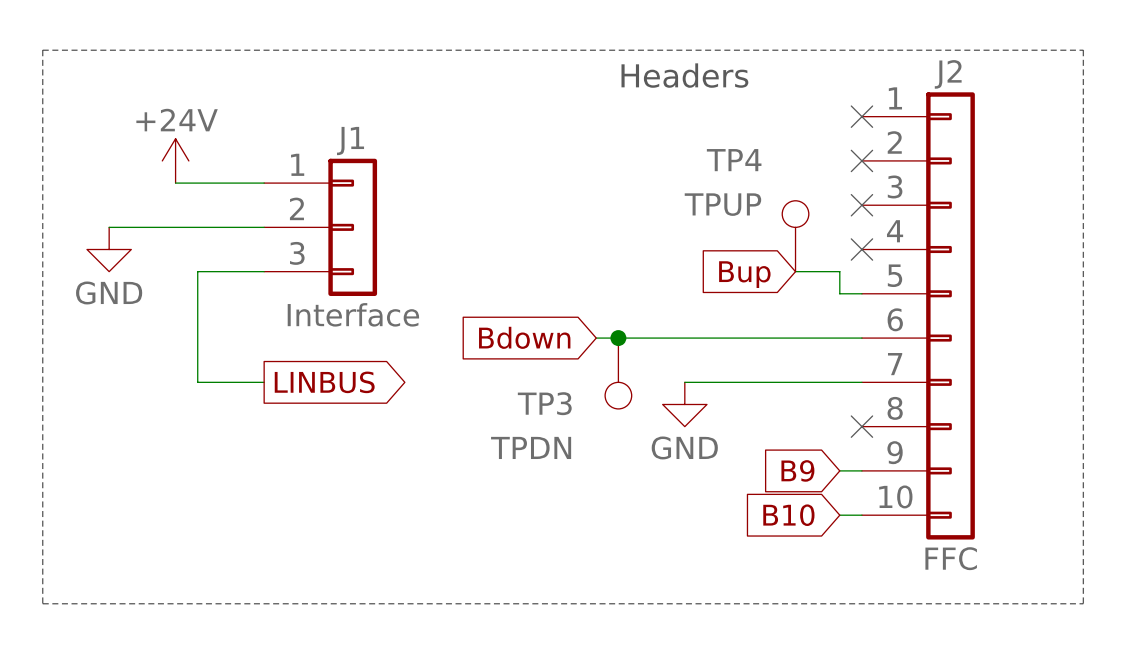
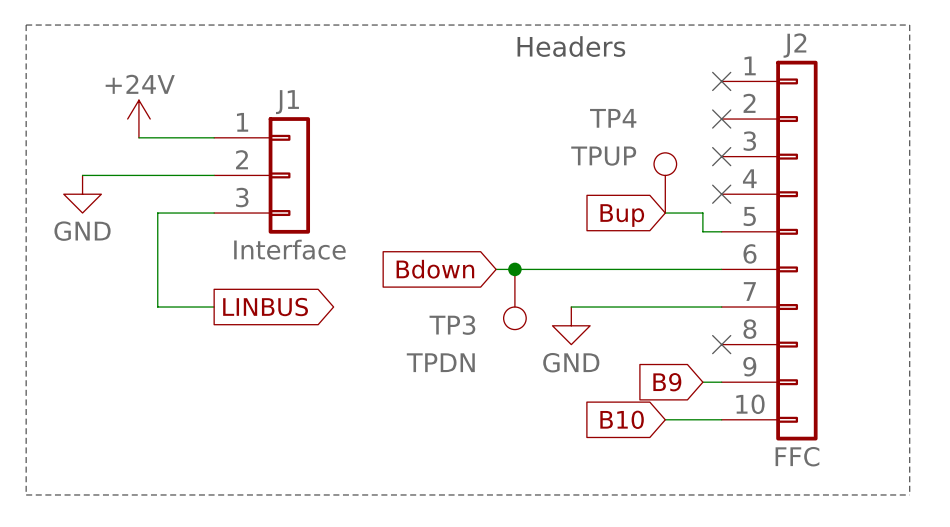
global label position: B10 (788, 515) -> B10 (622, 419)
wire: none -> (665, 419) (702, 419)

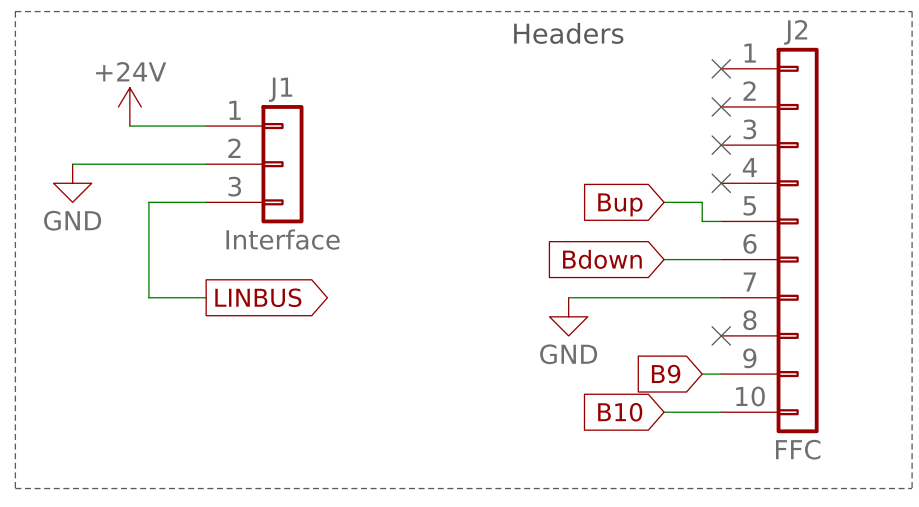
TP4: TPUP (665, 182) -> none
global label position: Bdown (435, 269) -> Bdown (602, 259)
wire: (496, 269) (665, 269) -> none
junction: (514, 269) -> none
TP3: TPDN (514, 299) -> none

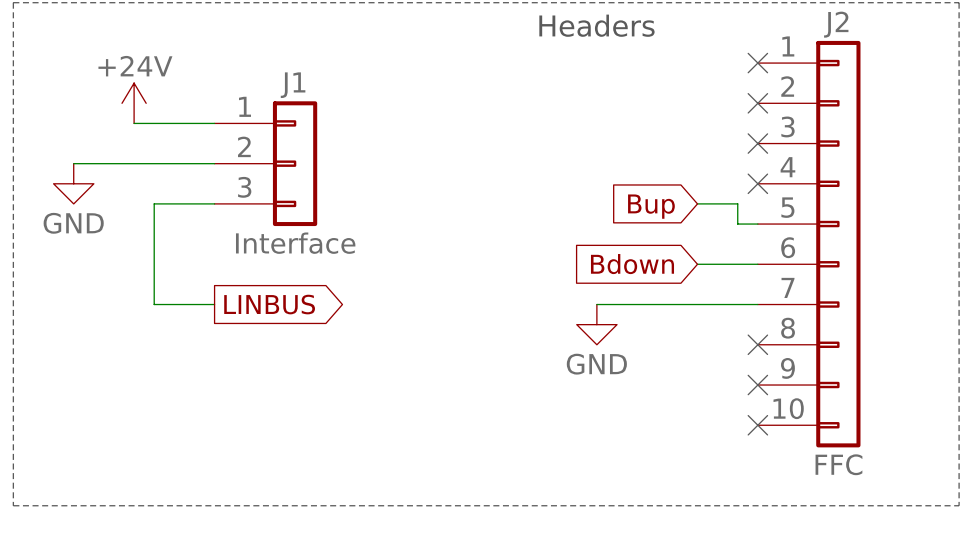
global label: B9 (666, 374) -> none
wire: (702, 374) (721, 374) -> none
no-connect mark: none -> (757, 385)
global label: B10 (620, 412) -> none
wire: (664, 412) (721, 412) -> none
no-connect mark: none -> (757, 425)

